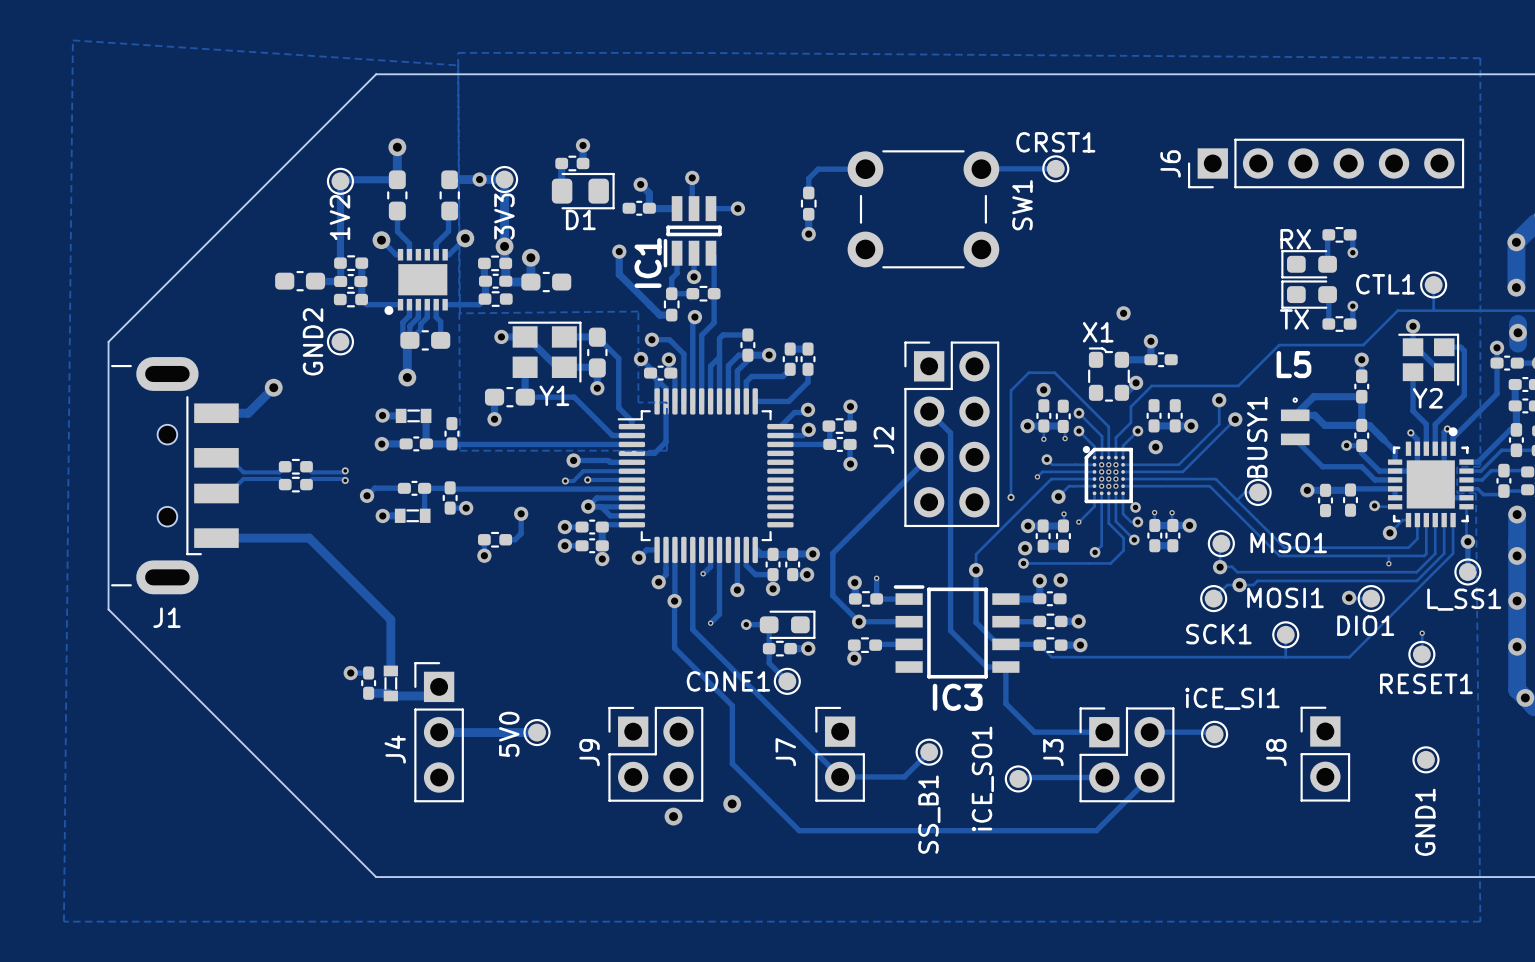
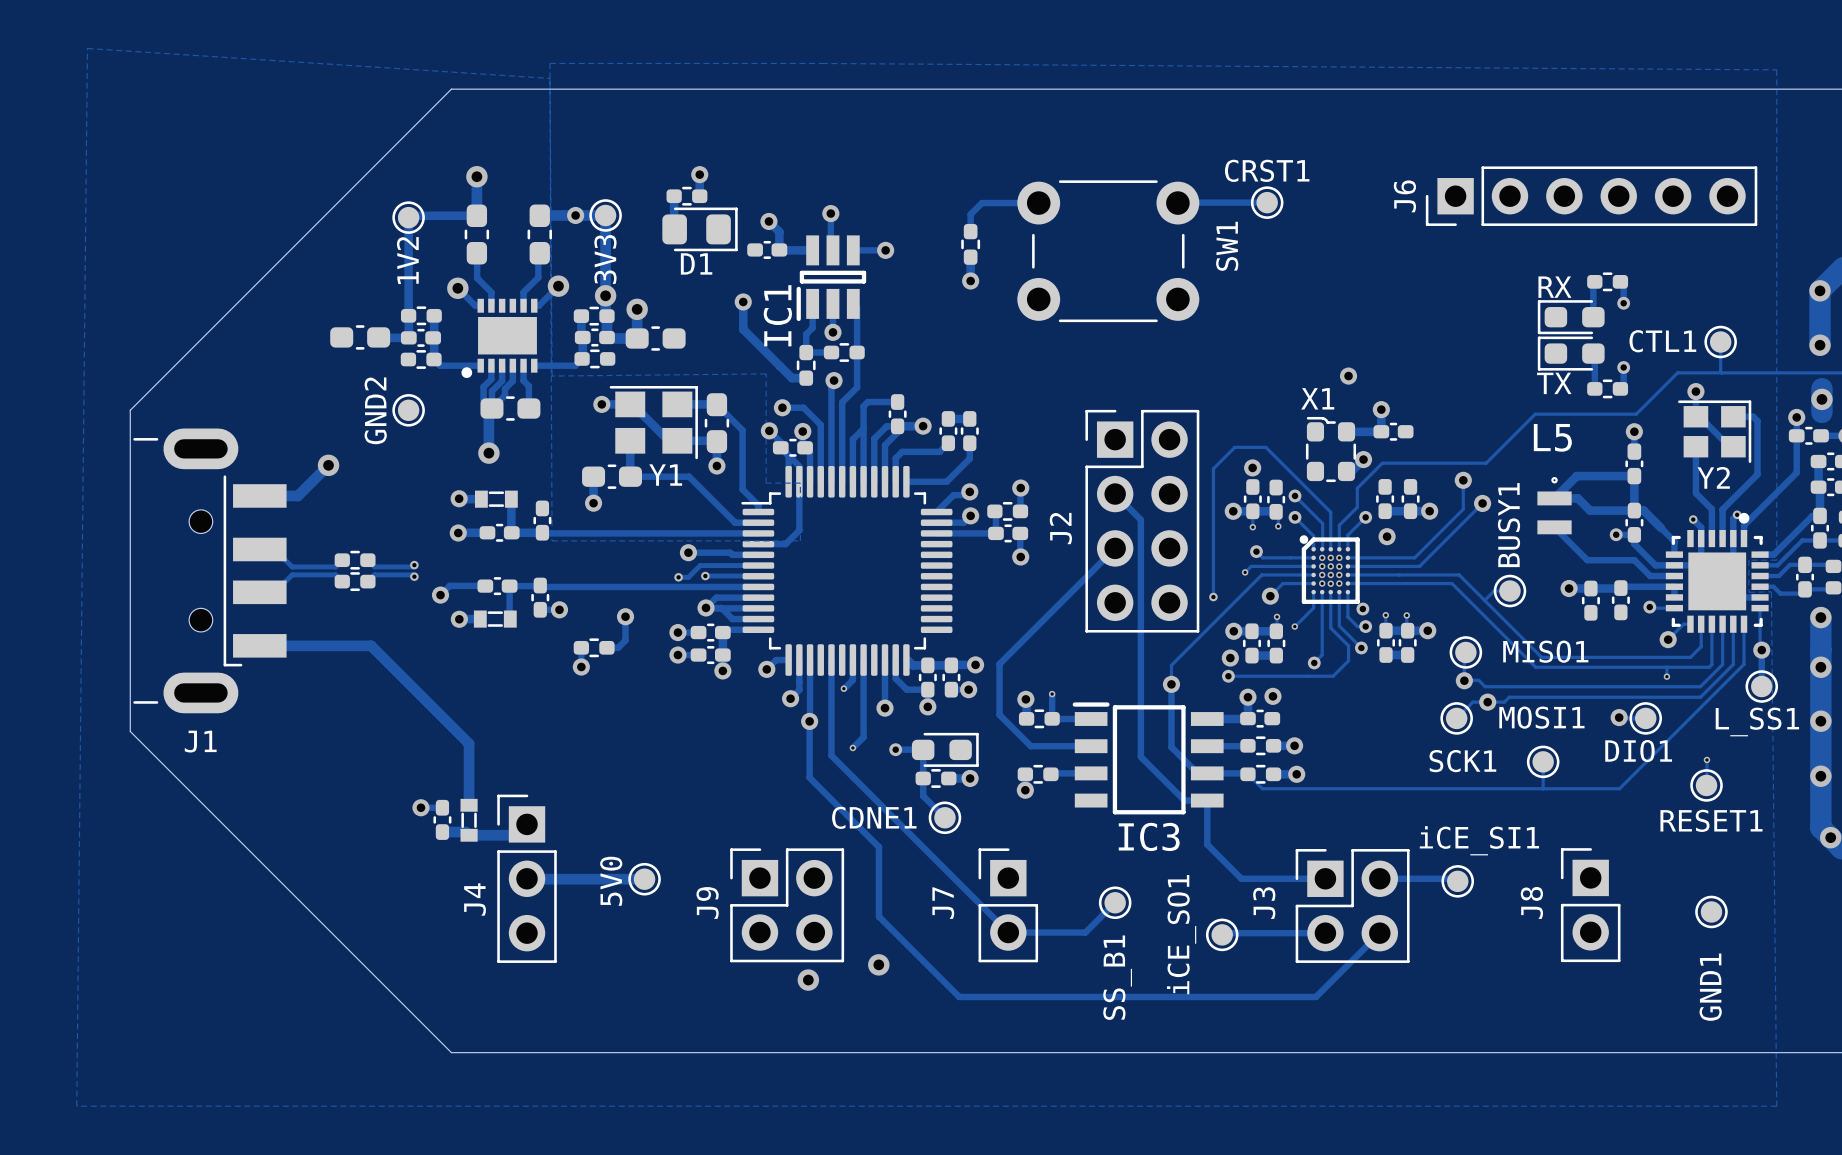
via: (859, 621) -> none

